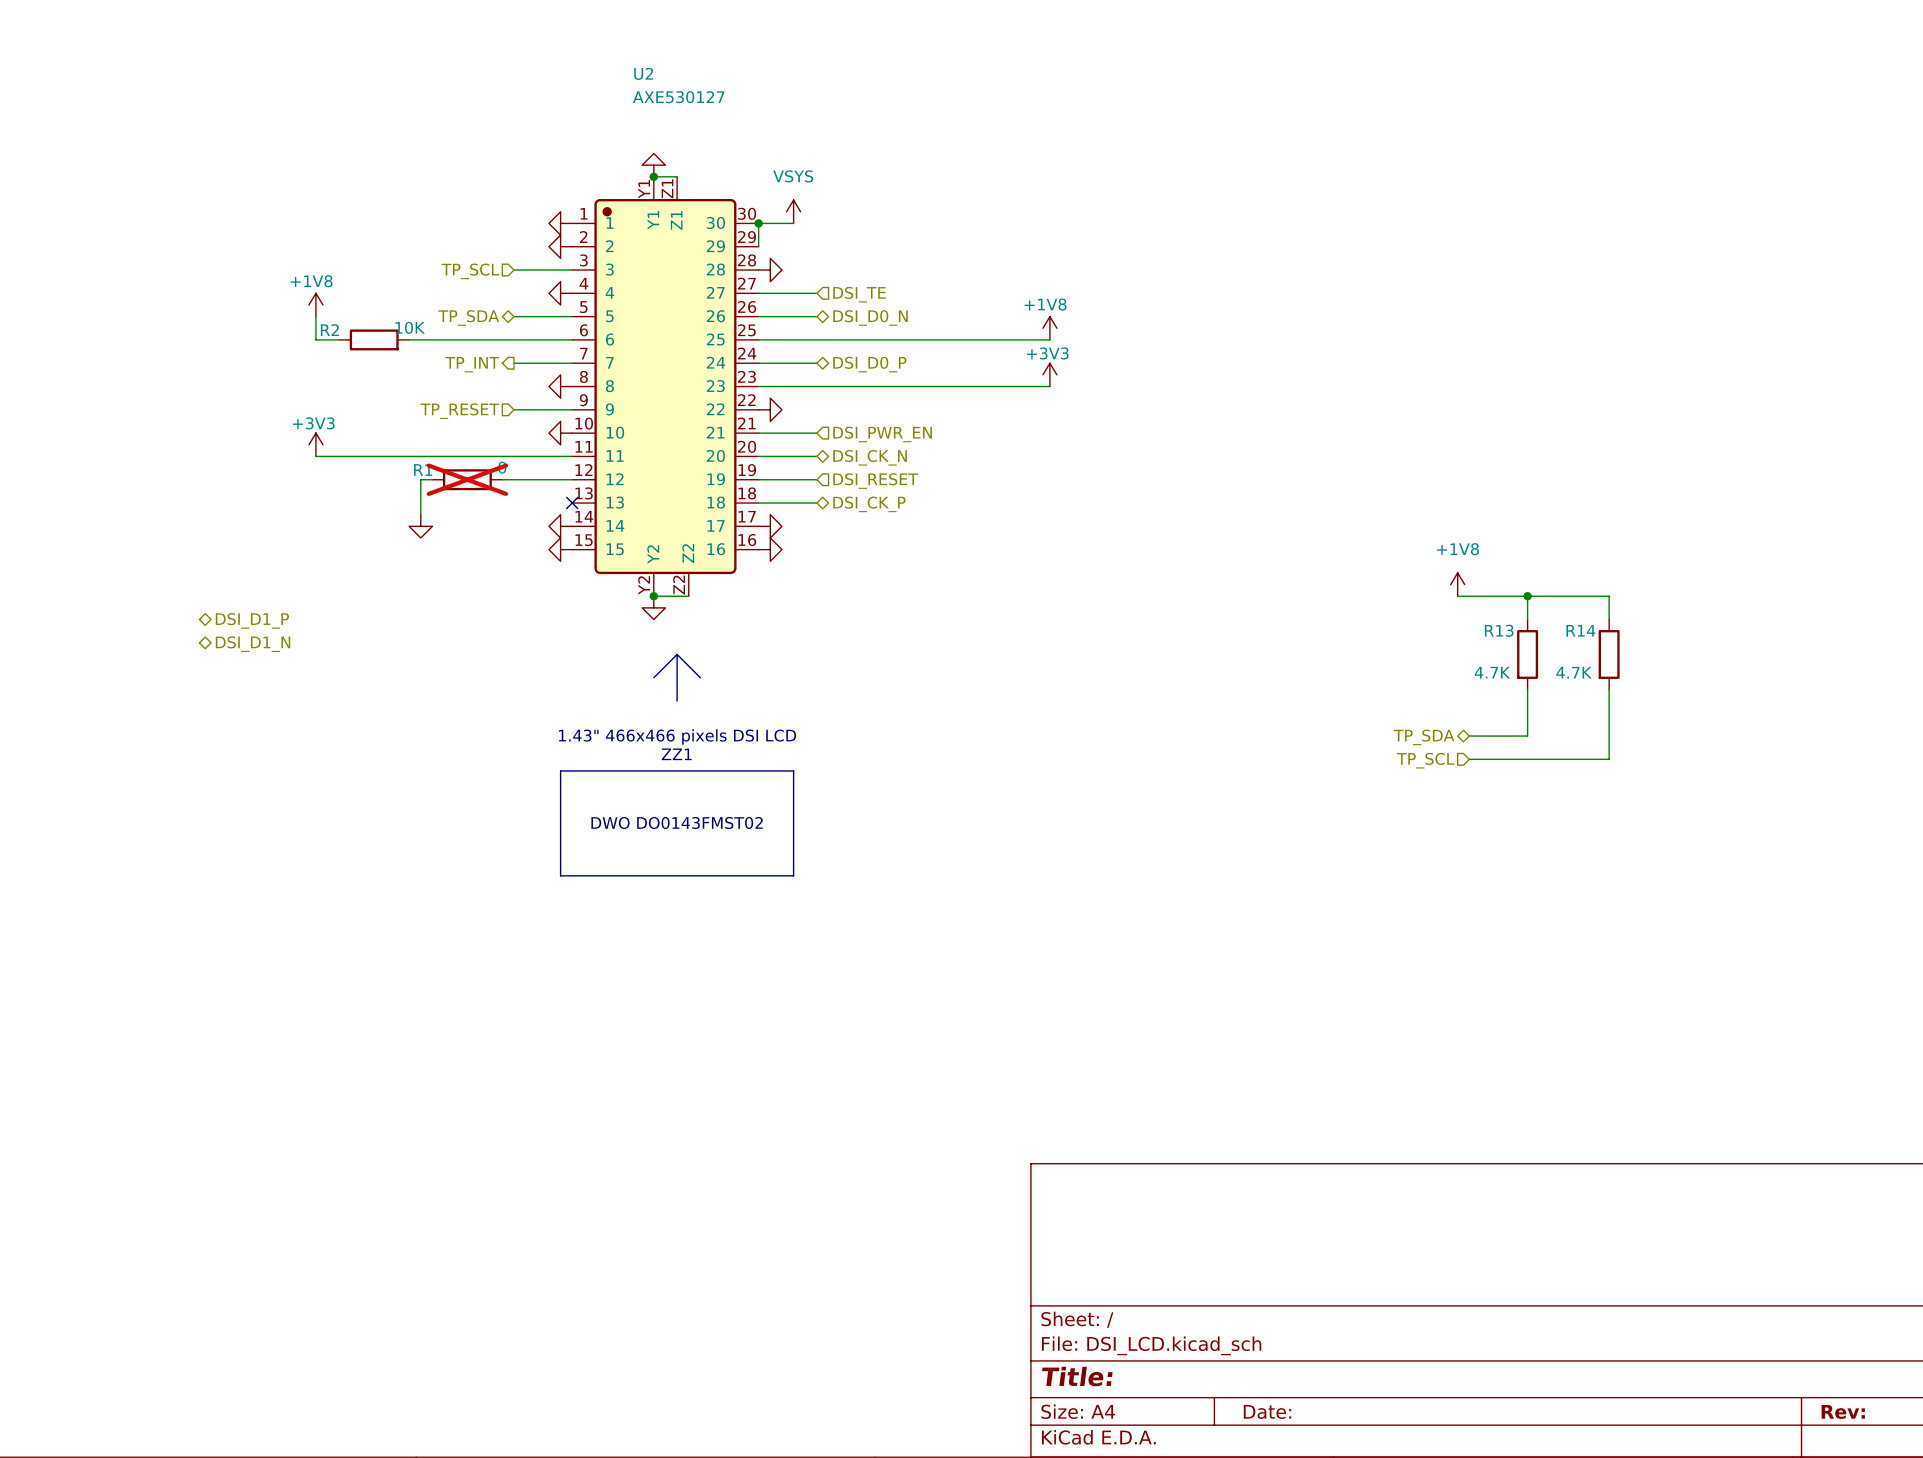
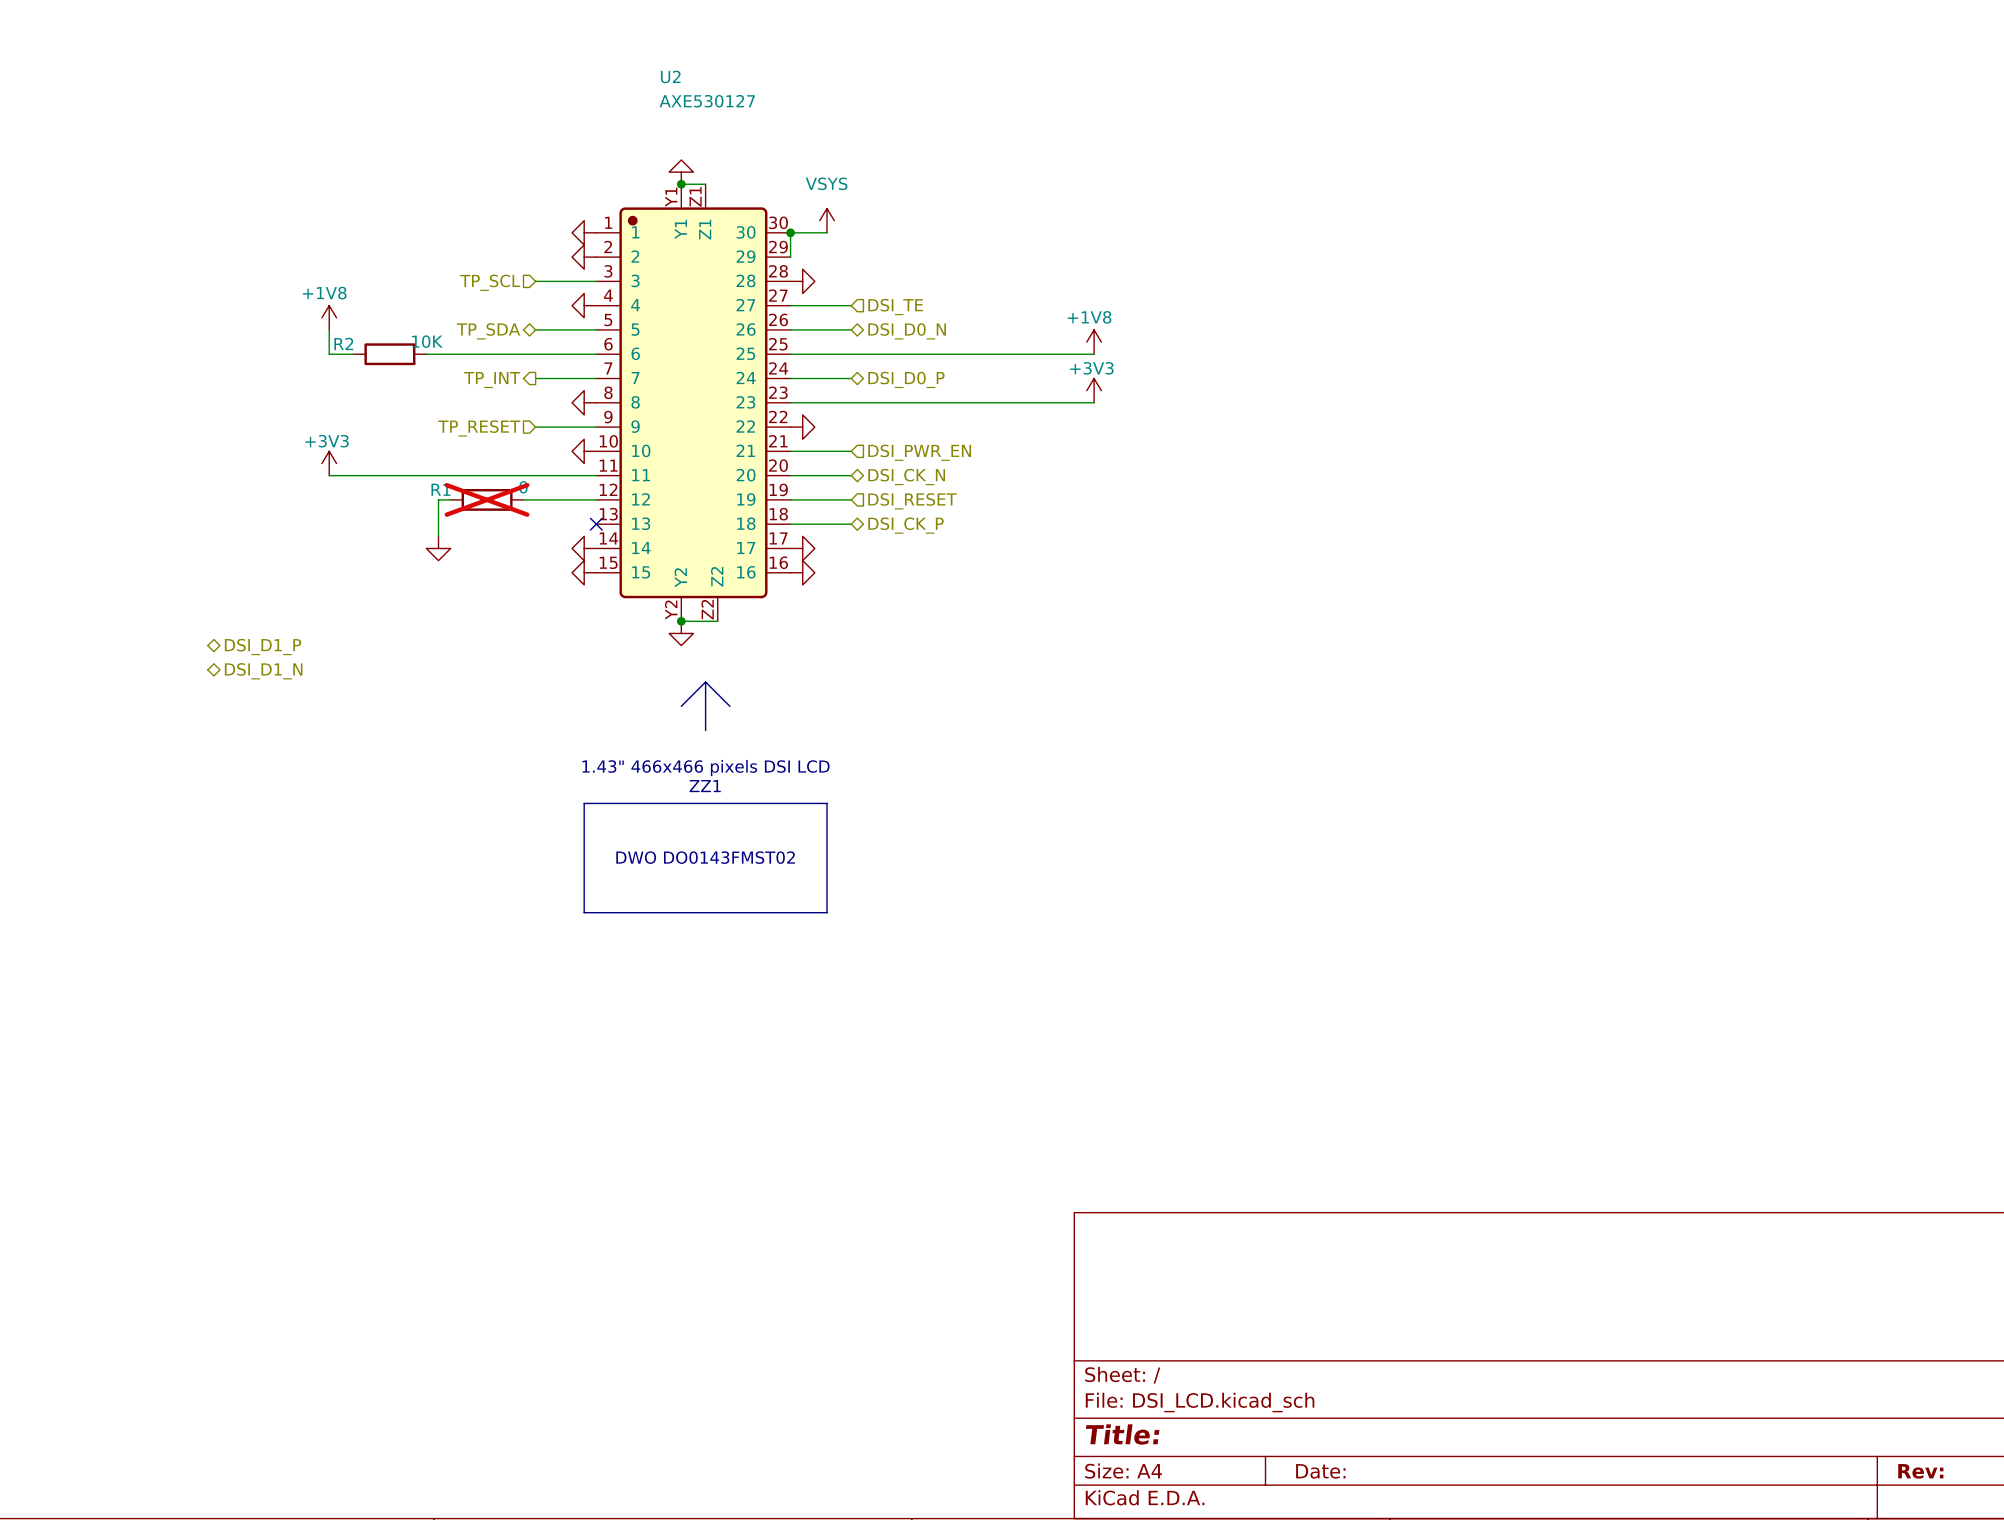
power symbol: +1V8 (1457, 584) -> none
wire: (1457, 596) (1609, 596) (1609, 619) -> none
wire: (1527, 596) (1527, 619) -> none
junction: (1527, 596) -> none
R13: 4.7K (1527, 654) -> none
R14: 4.7K (1609, 654) -> none
wire: (1527, 689) (1527, 736) (1469, 736) -> none
wire: (1609, 689) (1609, 759) (1469, 759) -> none
hierarchical label: TP_SDA (1424, 737) -> none
hierarchical label: TP_SCL (1425, 760) -> none

